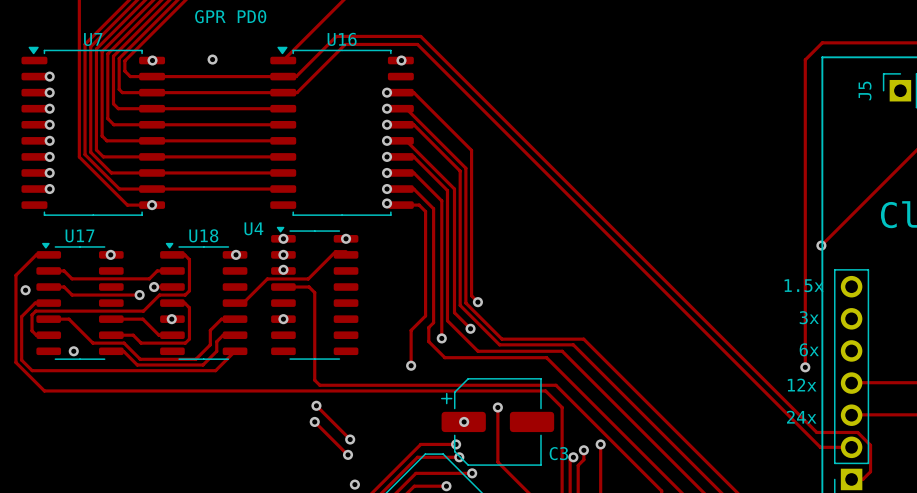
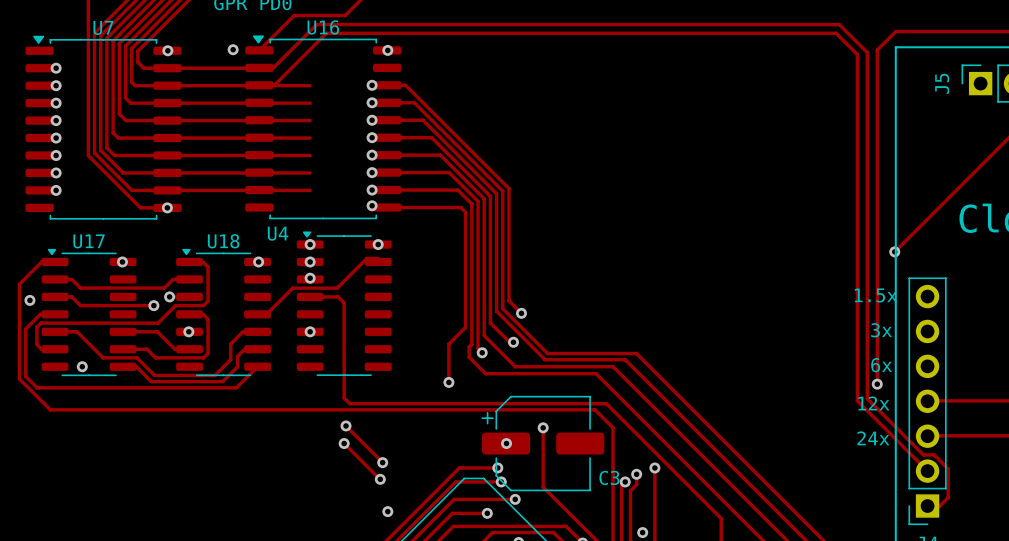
track: (315, 28) (283, 60) -> (345, 15) (294, 15) (259, 50)
track: (336, 36) (296, 76) (236, 76) -> (367, 24) (316, 24) (273, 67) (258, 68)
track: (420, 36) (816, 432) (847, 432) -> (459, 24) (839, 24) (867, 52) (867, 398) (923, 454)
track: (345, 44) (297, 92) (283, 92) -> (377, 33) (326, 33) (274, 85) (259, 85)
track: (417, 44) (820, 447) (851, 447) -> (455, 33) (836, 33) (857, 54) (857, 400) (927, 471)
via: none -> (387, 50)
via: (401, 60) -> none
via: none -> (372, 85)
track: (387, 92) (413, 92) (471, 150) (471, 295) -> (372, 85) (405, 85) (508, 188) (508, 300) (514, 306)
via: (387, 92) -> none
via: none -> (372, 102)
track: (387, 108) (406, 108) (465, 168) (465, 303) -> (372, 102) (414, 102) (502, 191) (502, 308) (508, 314)
via: (387, 108) -> none
via: none -> (372, 120)
track: (387, 124) (413, 124) (460, 171) (460, 305) -> (372, 120) (423, 120) (496, 193) (496, 311) (502, 316)
via: (387, 124) -> none
U16 position: (342, 131) -> (323, 127)
track: none -> (372, 137) (431, 137) (490, 196) (490, 323) (511, 343)
via: none -> (372, 137)
track: (387, 140) (406, 140) (454, 189) (454, 312) (470, 328) -> none
via: (387, 140) -> none
via: none -> (372, 155)
track: (387, 156) (413, 156) (447, 190) (447, 320) (478, 351) -> (372, 155) (440, 155) (484, 198) (484, 335) (515, 366) (521, 366)
via: (387, 156) -> none
via: none -> (372, 172)
track: (387, 172) (413, 172) (441, 200) (441, 338) -> (372, 172) (449, 172) (478, 201) (478, 348) (482, 352)
via: (387, 172) -> none
via: none -> (372, 190)
track: (387, 189) (413, 189) (433, 208) (433, 322) (428, 327) (429, 342) -> (372, 190) (457, 190) (471, 204) (471, 344) (469, 347) (469, 357)
via: (387, 189) -> none
via: none -> (372, 205)
track: (387, 203) (388, 205) (419, 205) (425, 211) (425, 315) -> (372, 205) (373, 207) (460, 207) (465, 212) (464, 328)
via: (387, 203) -> none

